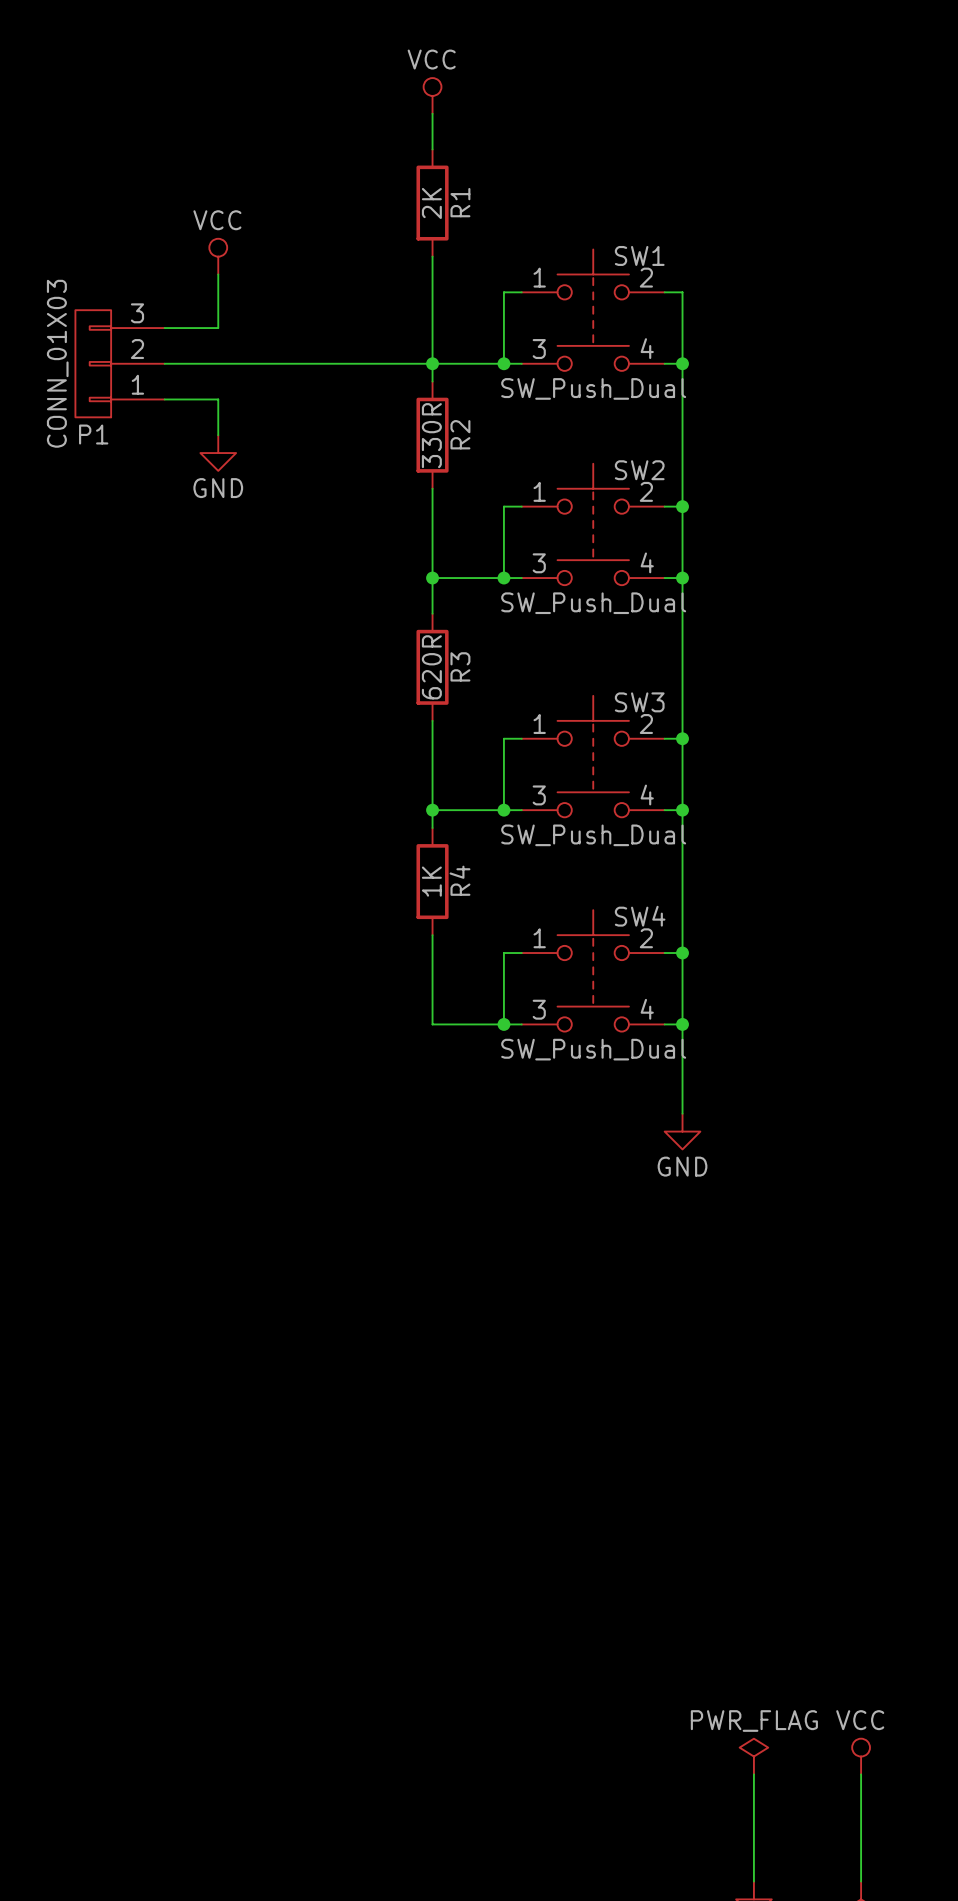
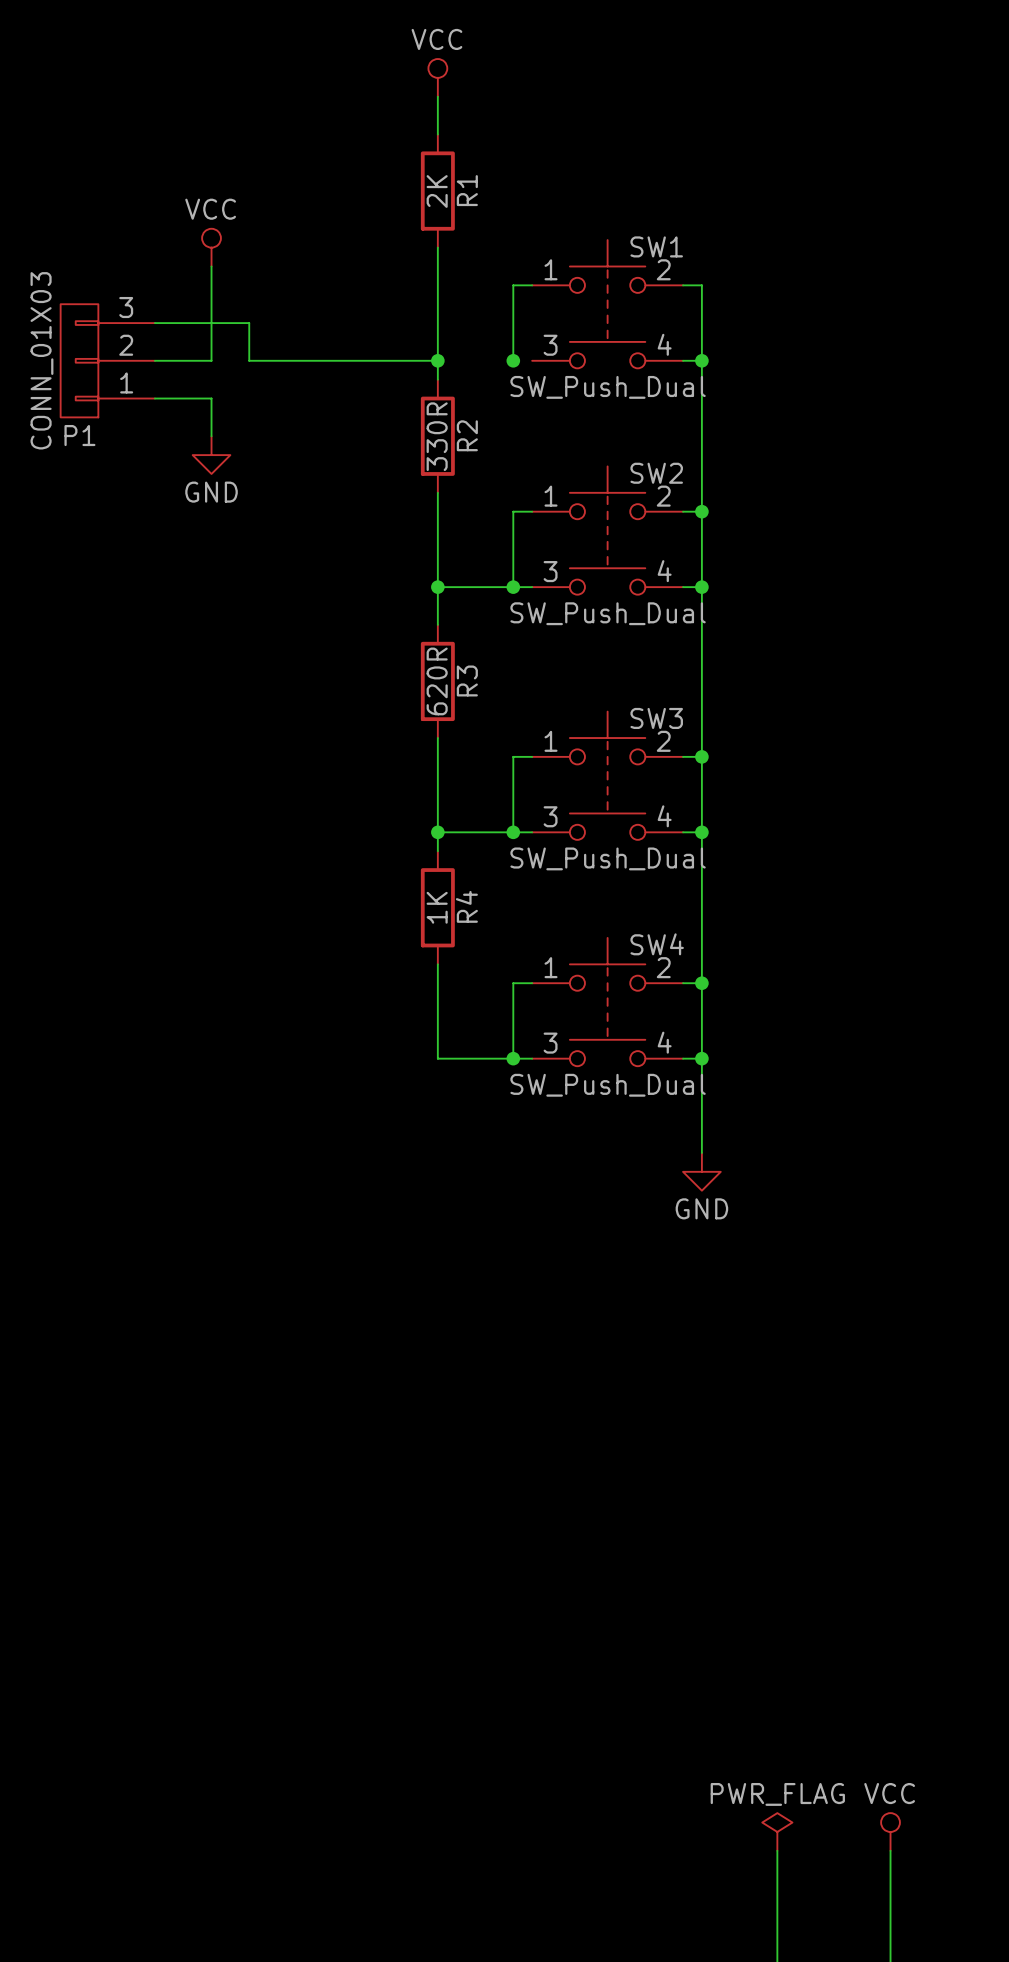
wire: (218, 363) (253, 363) -> (211, 360) (211, 323) (249, 323) (249, 360)
wire: (432, 363) (521, 363) -> none

